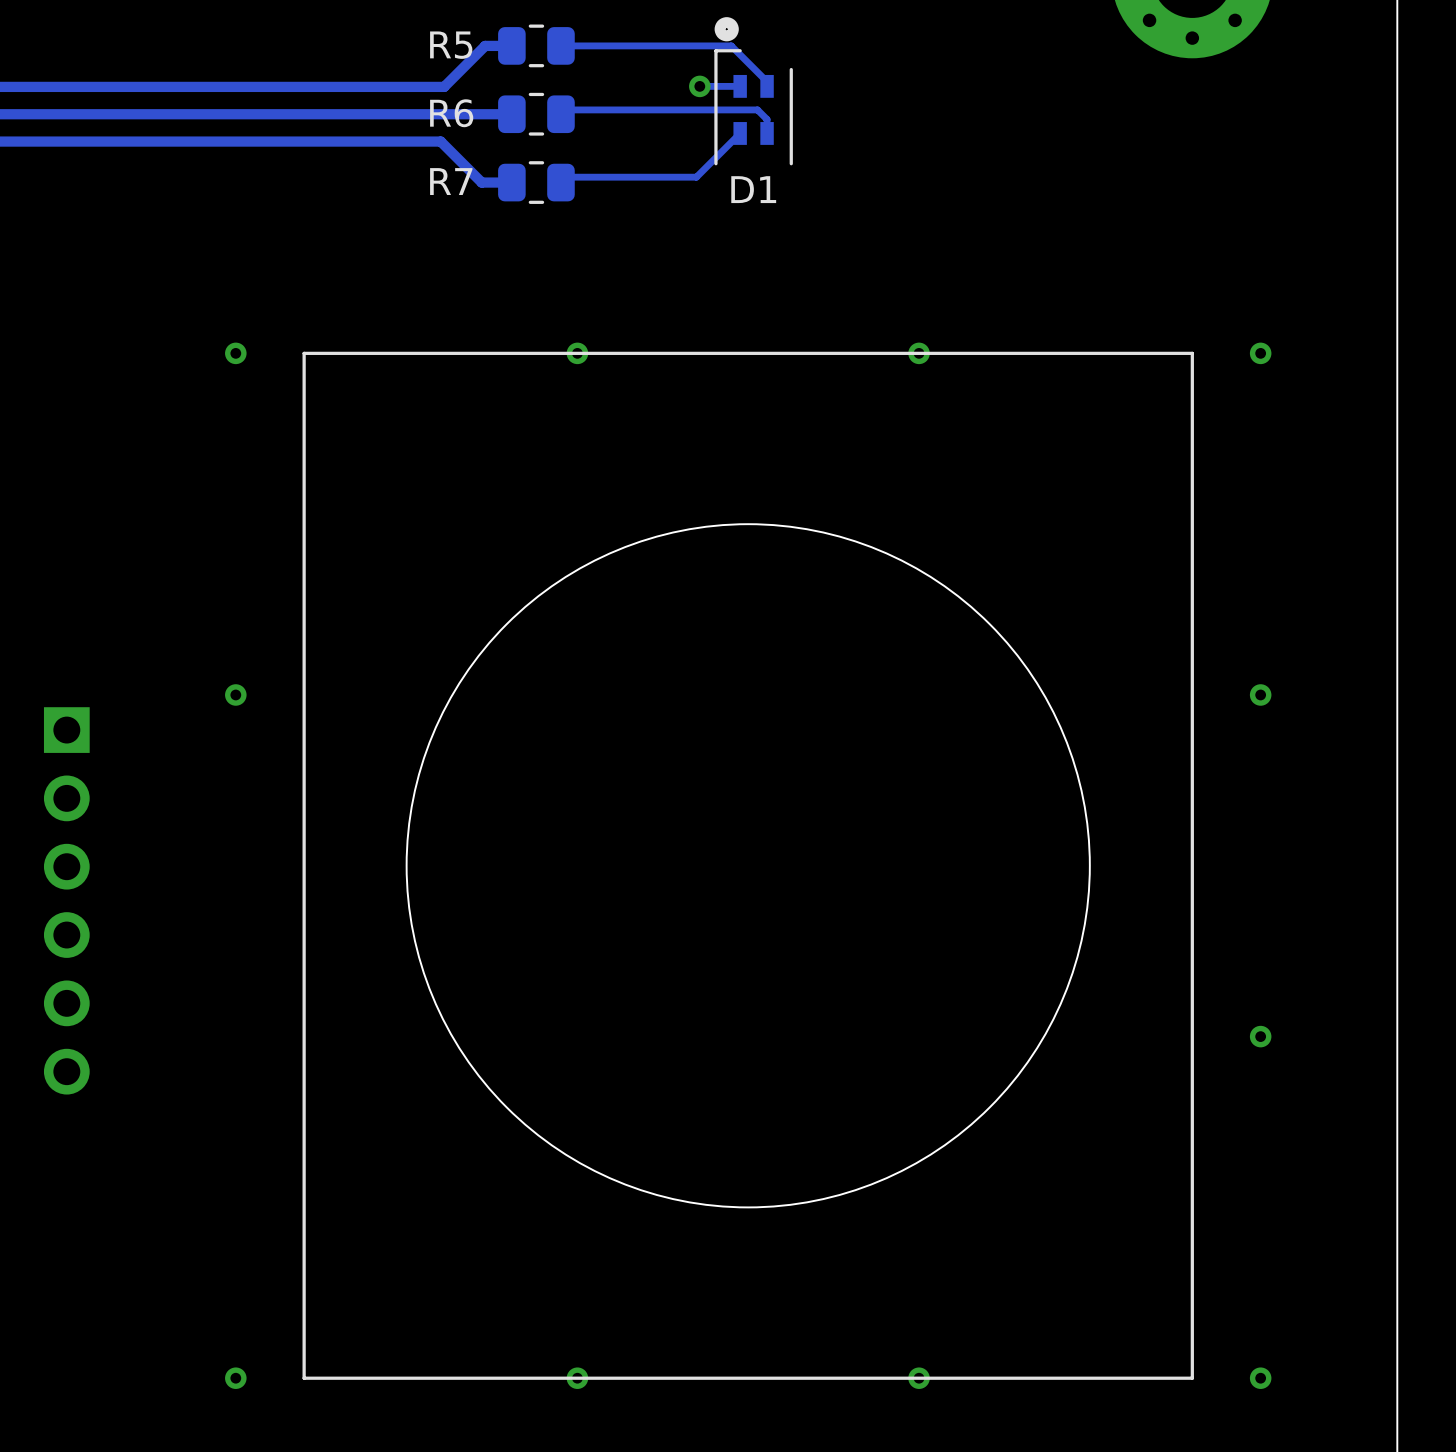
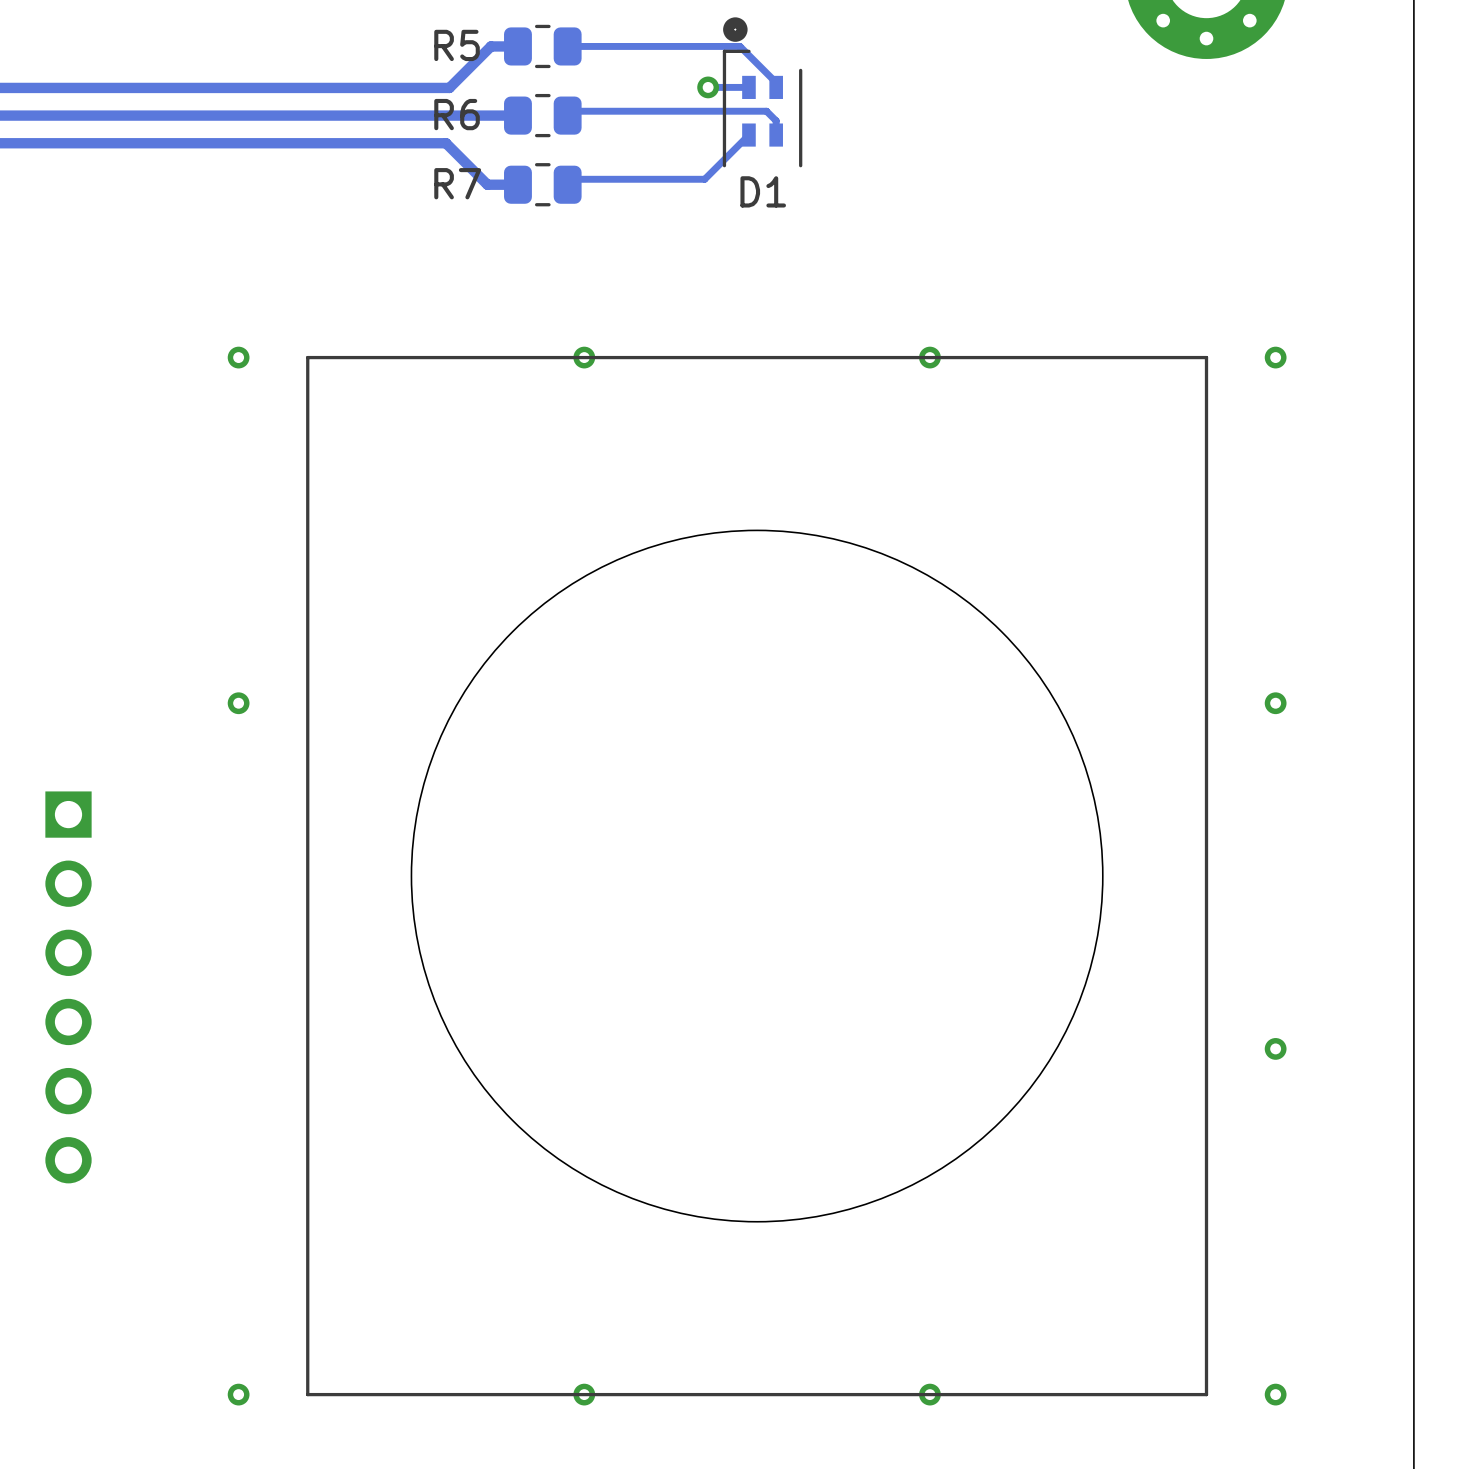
part position: (66, 900) -> (68, 987)

